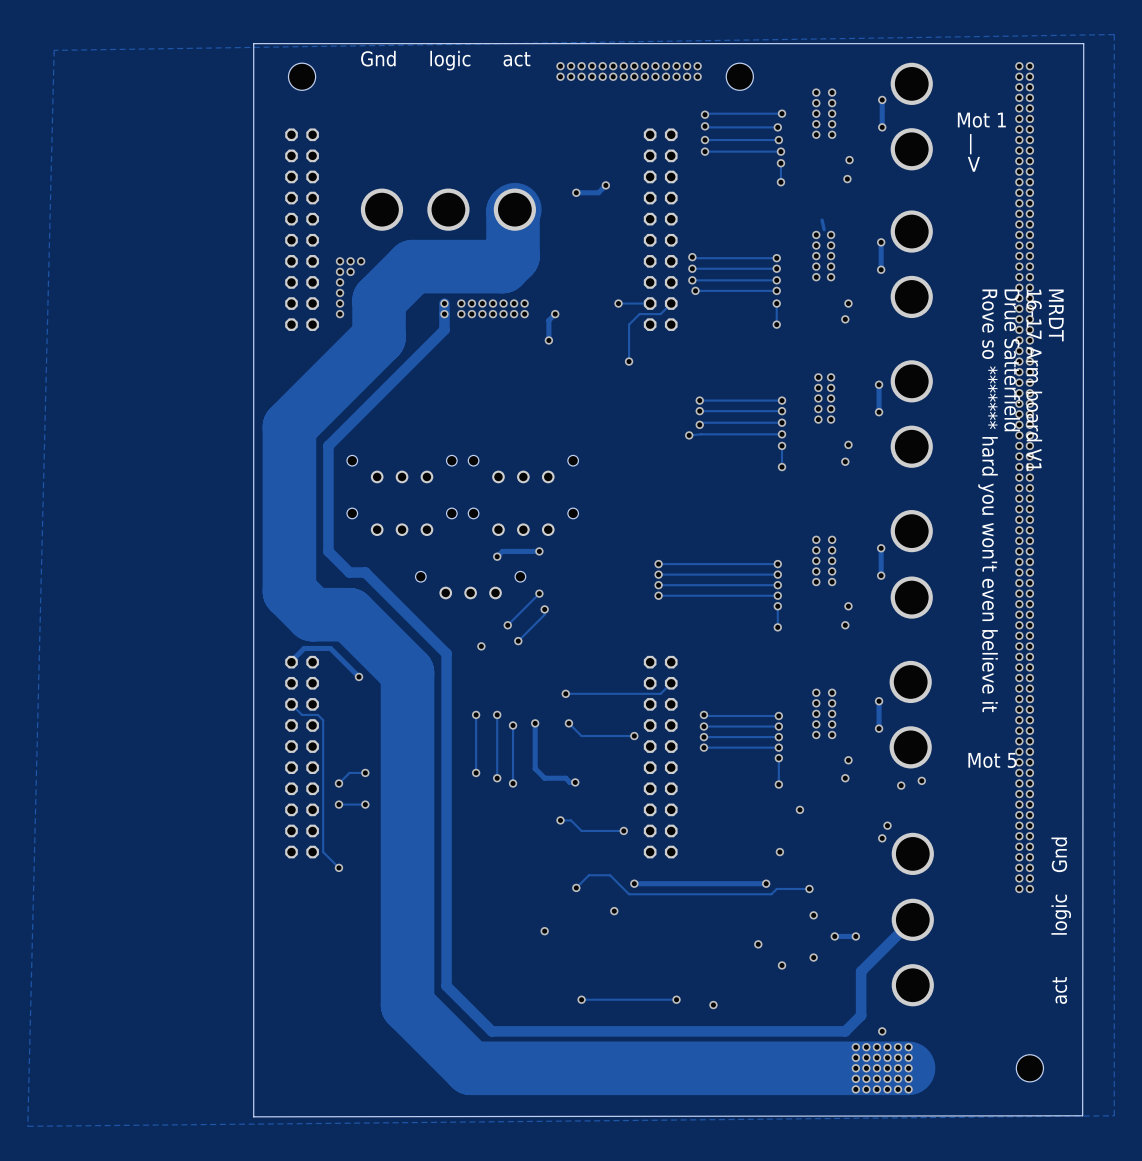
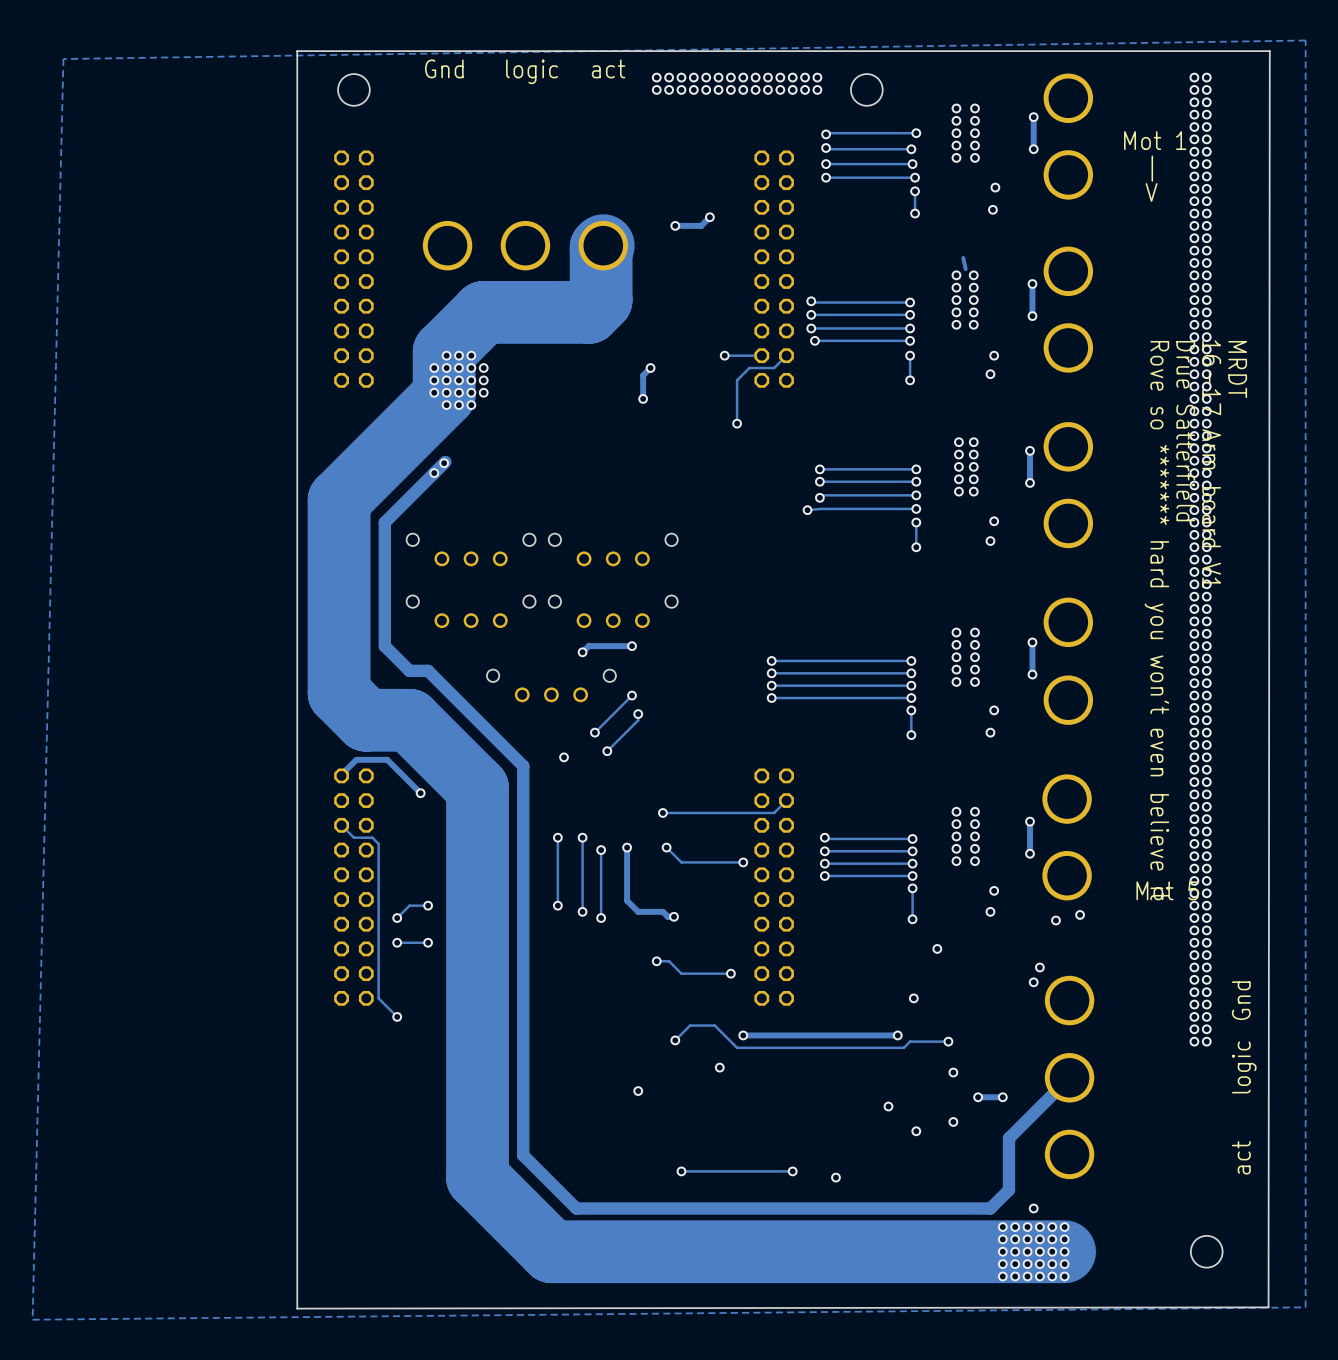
via: (340, 261) -> none
via: (350, 261) -> none
via: (361, 261) -> none
via: (340, 271) -> none
via: (350, 271) -> none
via: (340, 282) -> none
via: (340, 292) -> none
via: (340, 303) -> none
via: none -> (446, 355)
via: none -> (458, 355)
via: none -> (471, 355)
track: (444, 303) (444, 329) (380, 394) -> none
via: (444, 303) -> none
via: (461, 303) -> none
via: (471, 303) -> none
via: (482, 303) -> none
via: (492, 303) -> none
via: (503, 303) -> none
via: (514, 303) -> none
via: (524, 303) -> none
via: (340, 314) -> none
via: none -> (434, 368)
via: none -> (446, 368)
via: none -> (458, 368)
via: none -> (471, 368)
via: none -> (483, 368)
via: (444, 314) -> none
via: (461, 314) -> none
via: (471, 314) -> none
via: (482, 314) -> none
via: (492, 314) -> none
via: (503, 314) -> none
via: (514, 314) -> none
via: (524, 314) -> none
via: none -> (434, 380)
via: none -> (446, 380)
via: none -> (458, 380)
via: none -> (471, 380)
via: none -> (483, 380)
via: none -> (434, 392)
via: none -> (446, 392)
via: none -> (458, 392)
via: none -> (471, 392)
via: none -> (483, 392)
via: none -> (446, 405)
via: none -> (458, 405)
via: none -> (471, 405)
via: none -> (444, 463)
via: none -> (434, 473)

